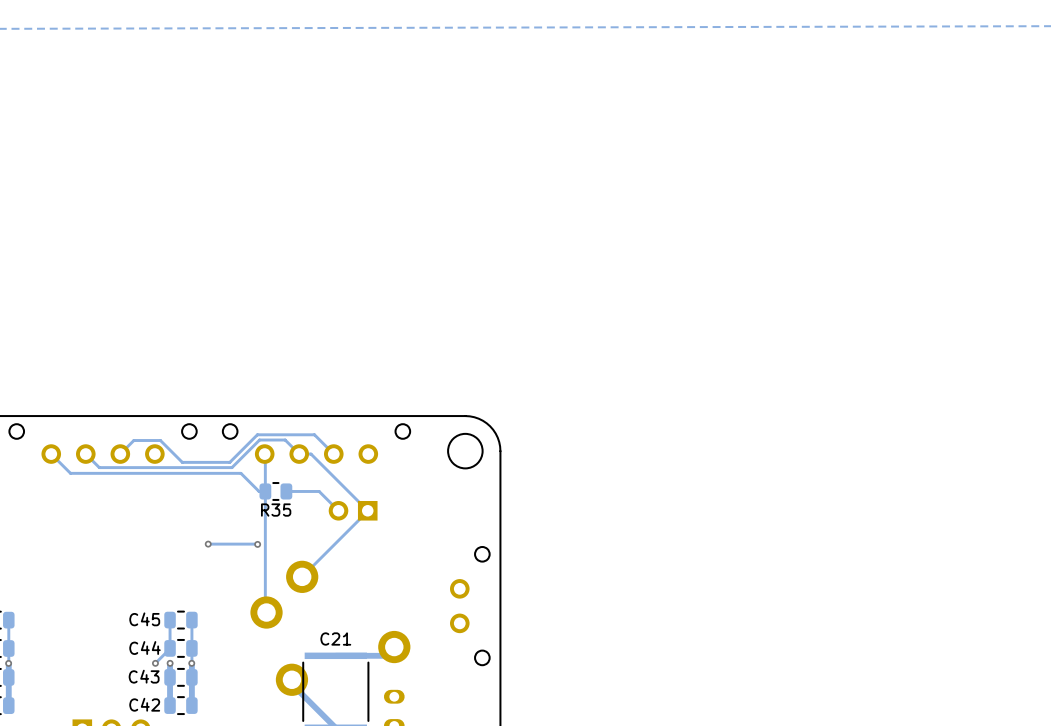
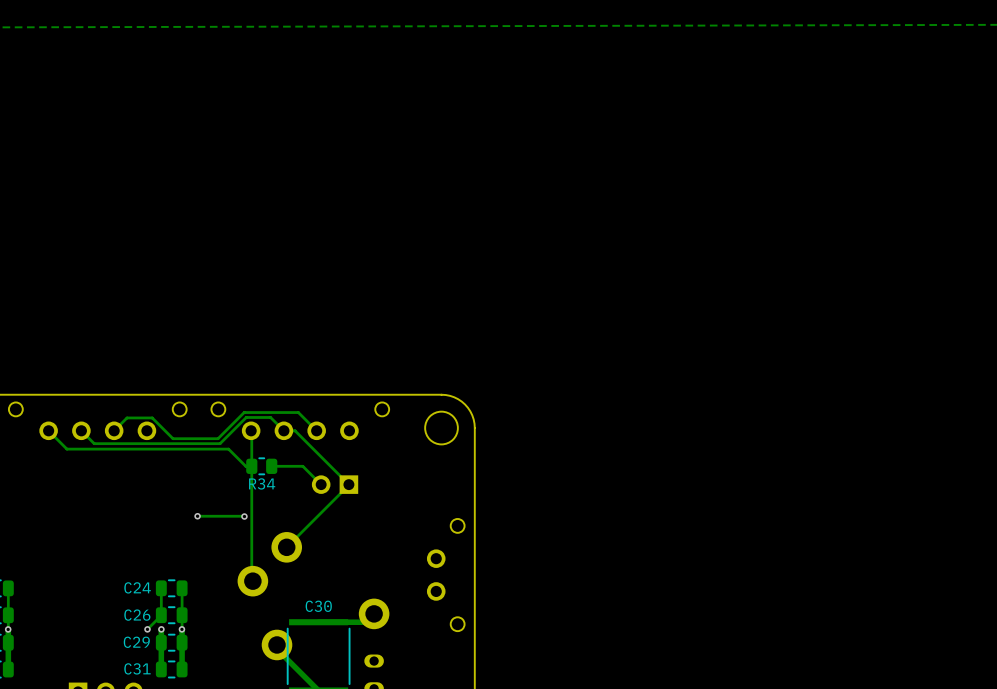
R35 name: R35 (276, 510) -> R34 (262, 483)
C45 name: C45 (144, 619) -> C24 (137, 587)
C21 name: C21 (335, 639) -> C30 (318, 606)
C44 name: C44 (145, 648) -> C26 (137, 615)
C43 name: C43 (144, 676) -> C29 (136, 642)
C42 name: C42 (144, 704) -> C31 (137, 668)

